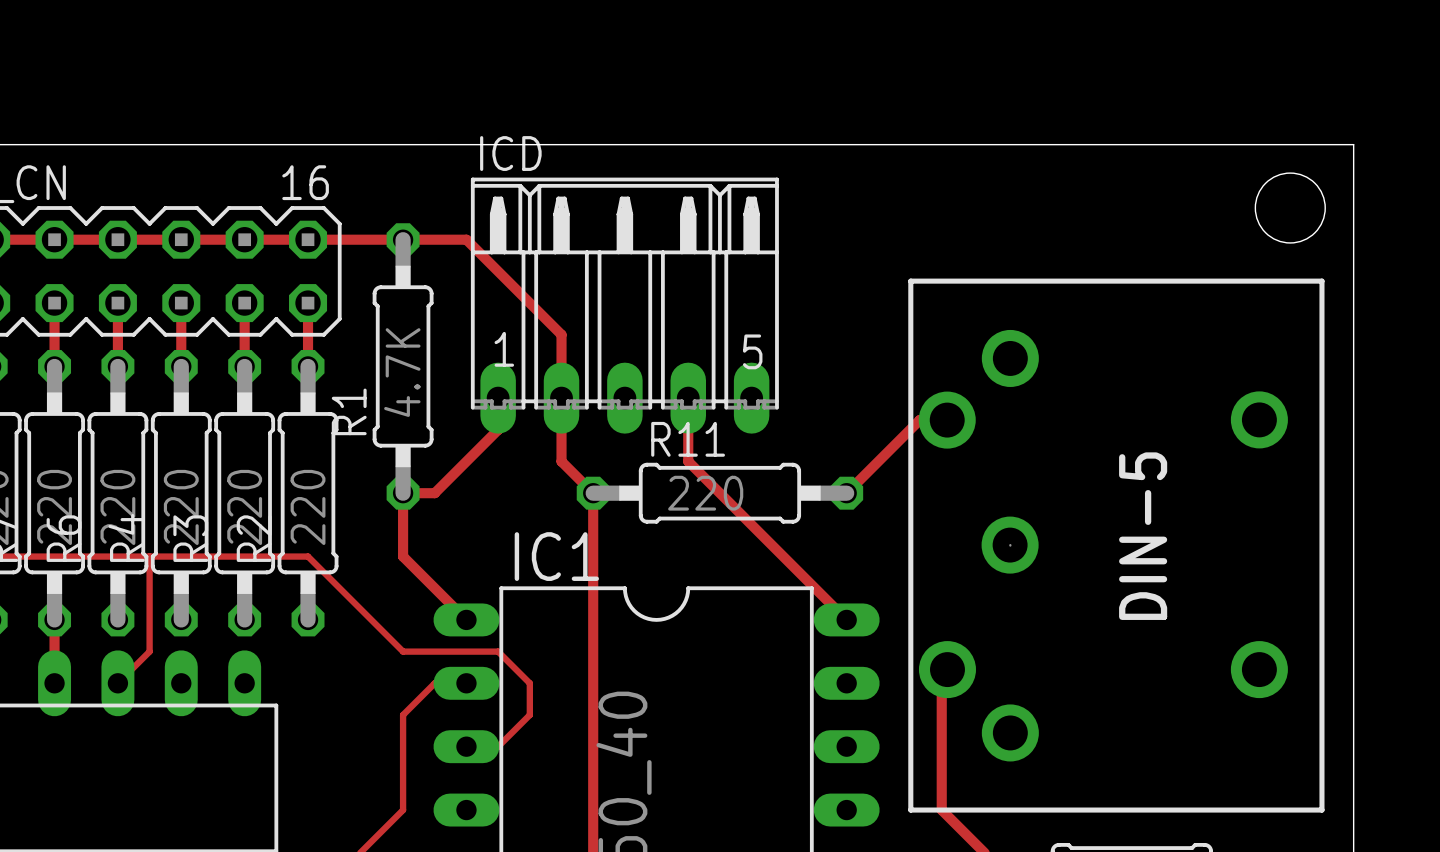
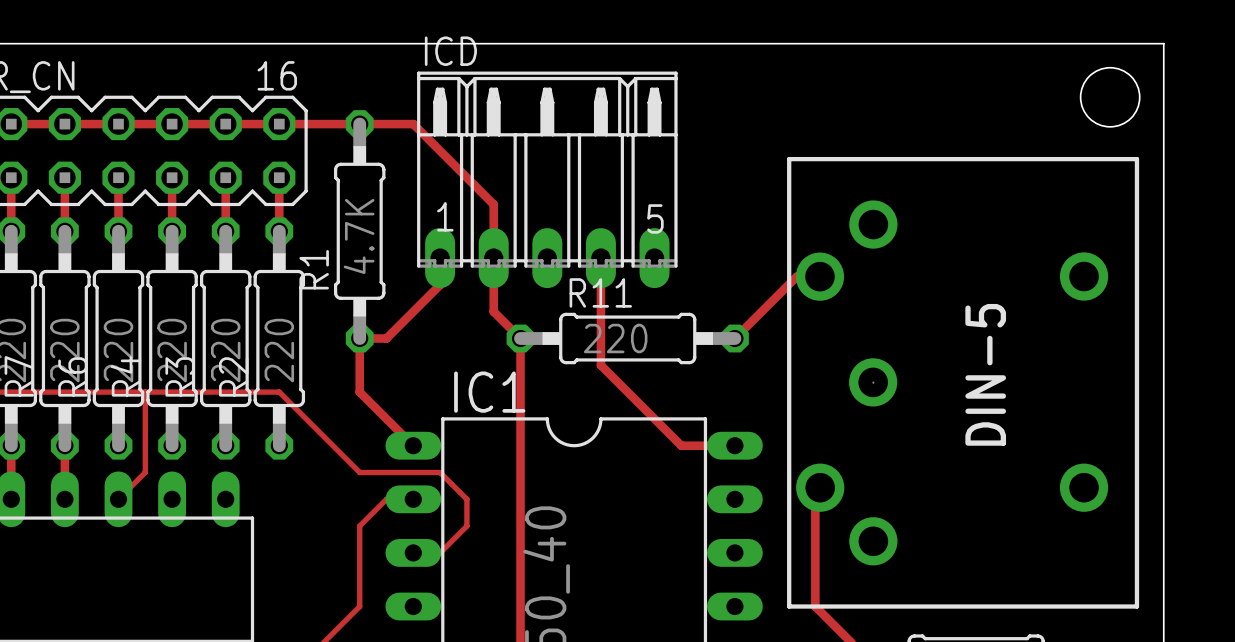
track: (688, 461) (846, 619) -> (600, 311) (600, 365) (681, 445) (734, 445)

